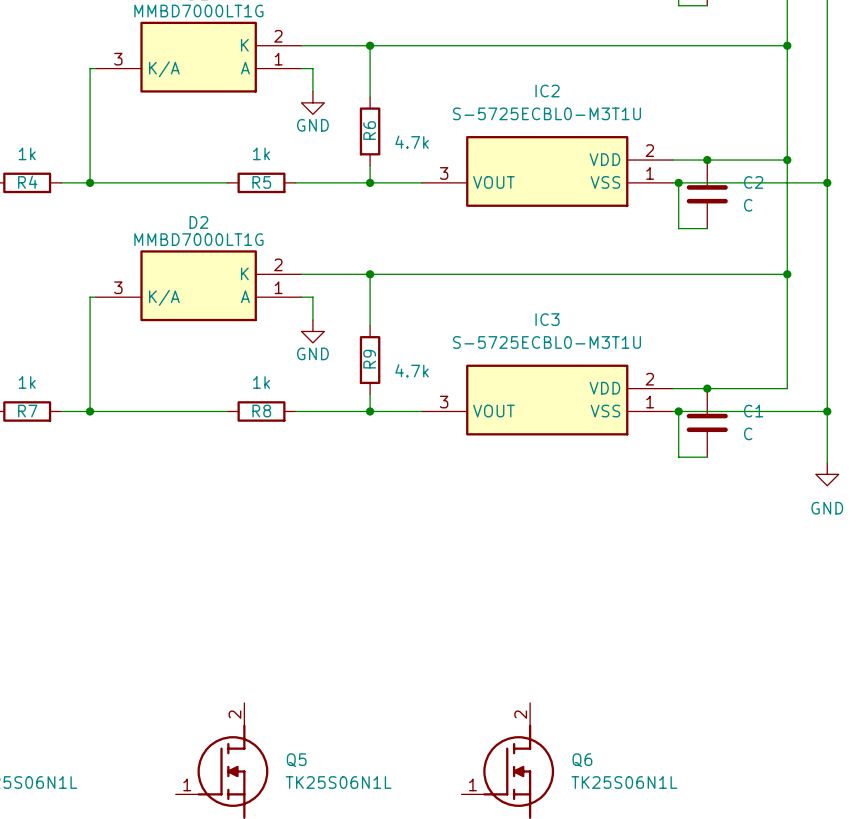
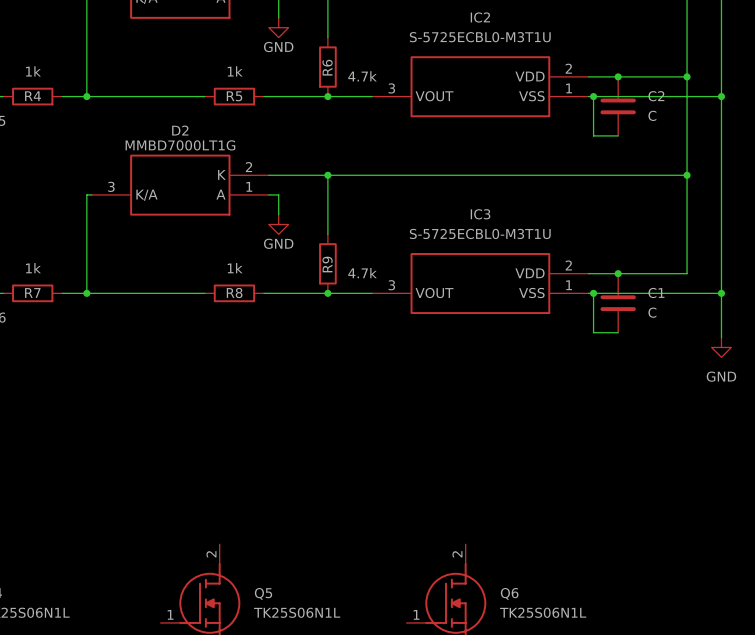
R6 position: (370, 131) -> (327, 67)
R9 position: (370, 360) -> (327, 263)

